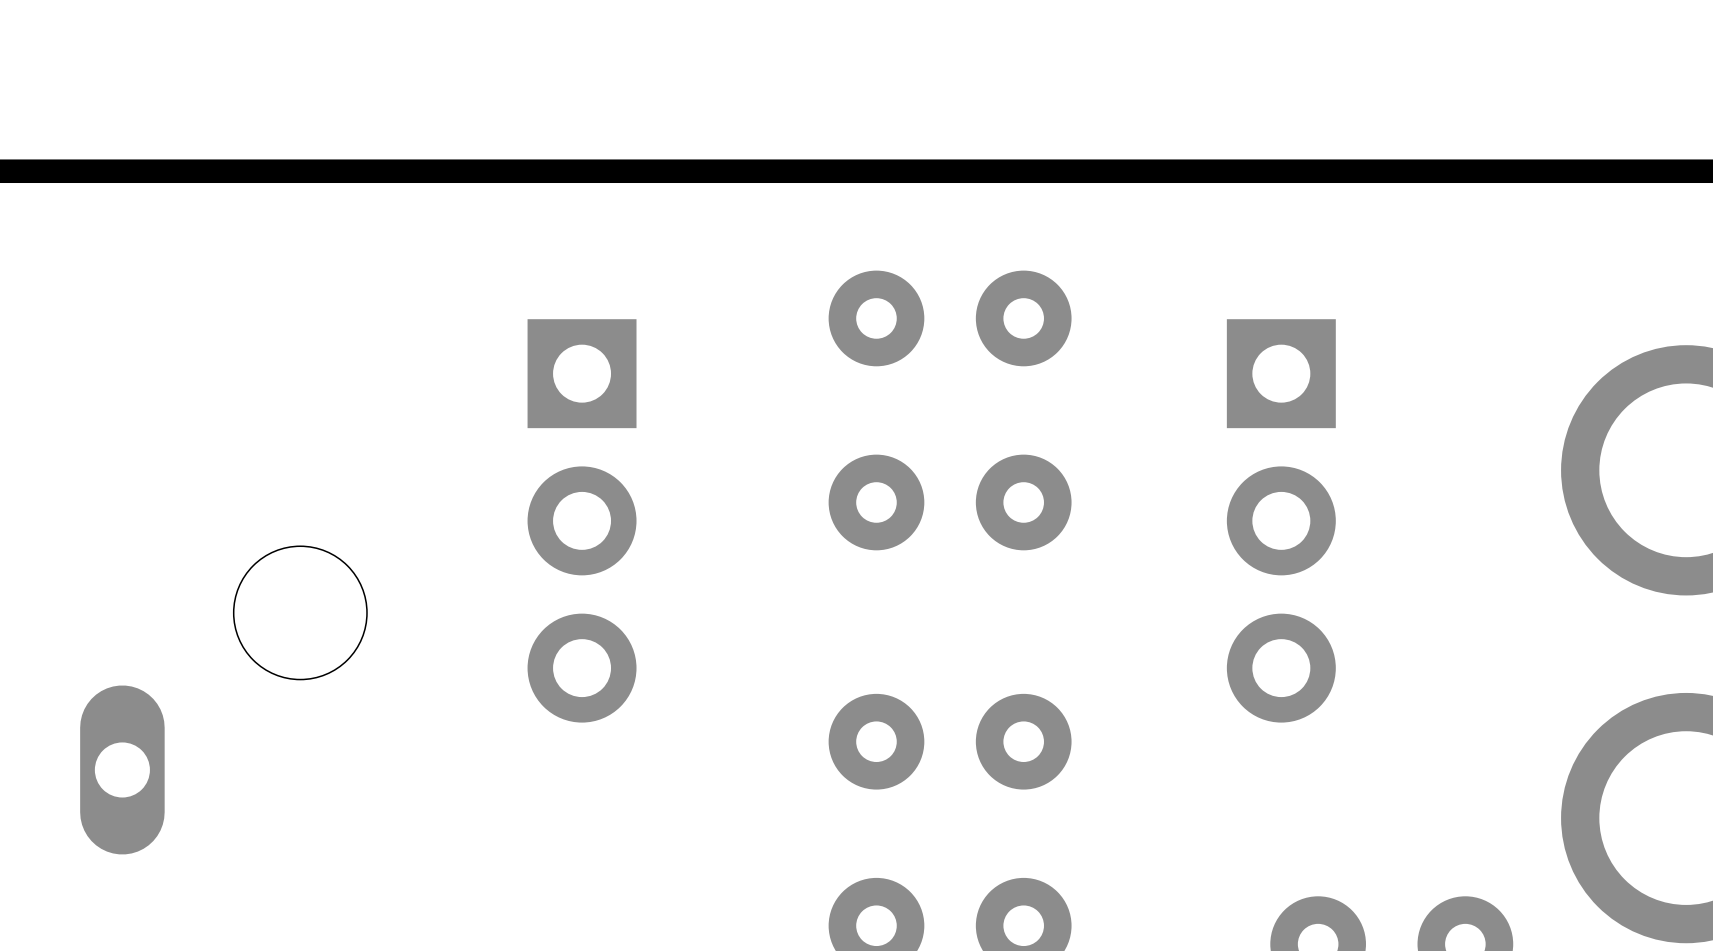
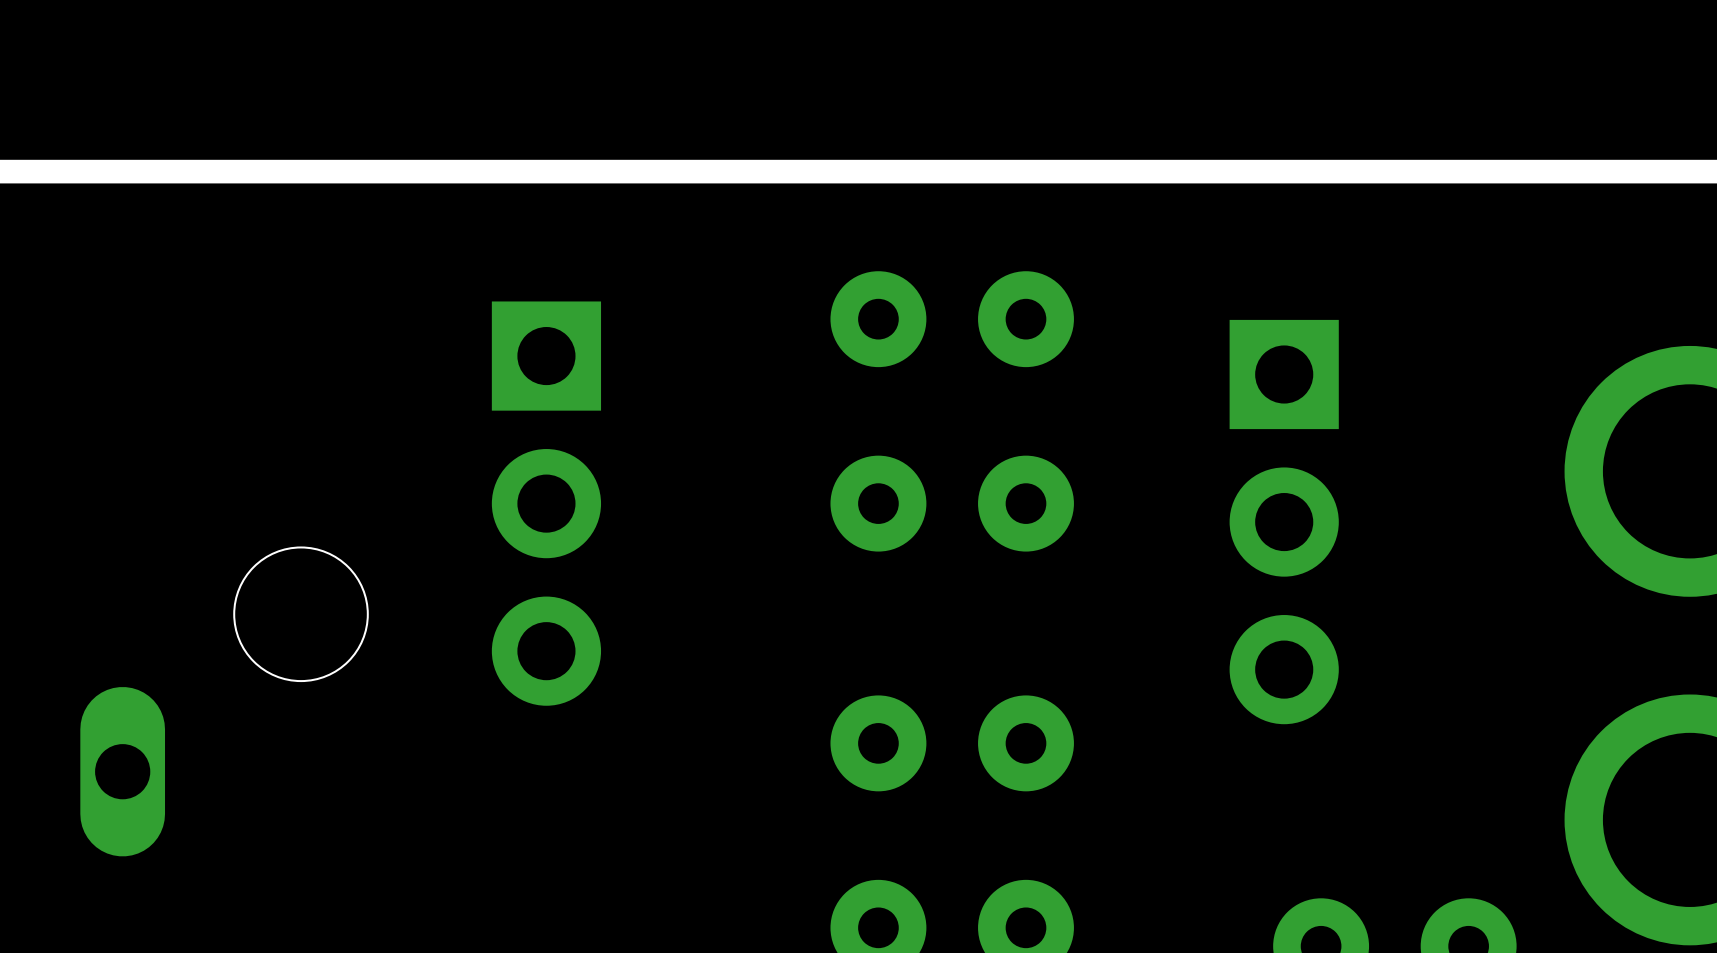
part position: (582, 520) -> (546, 503)

